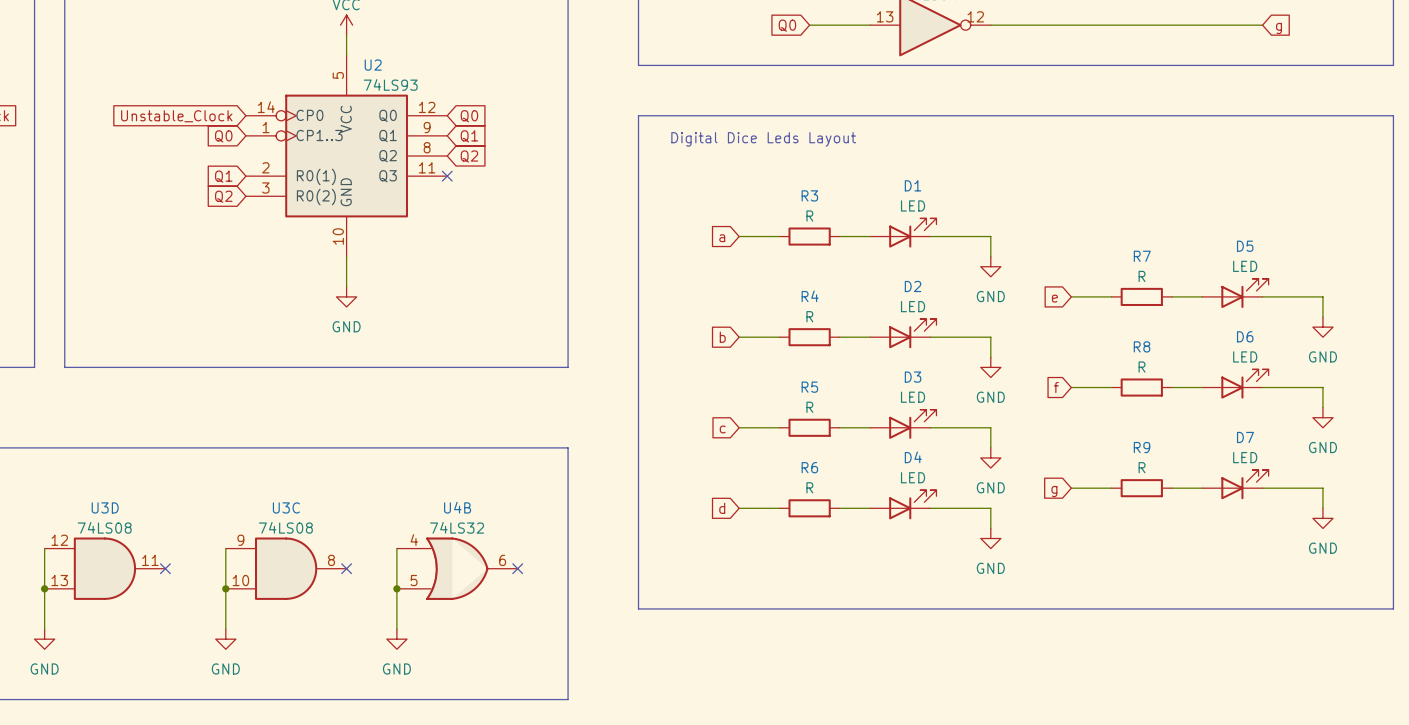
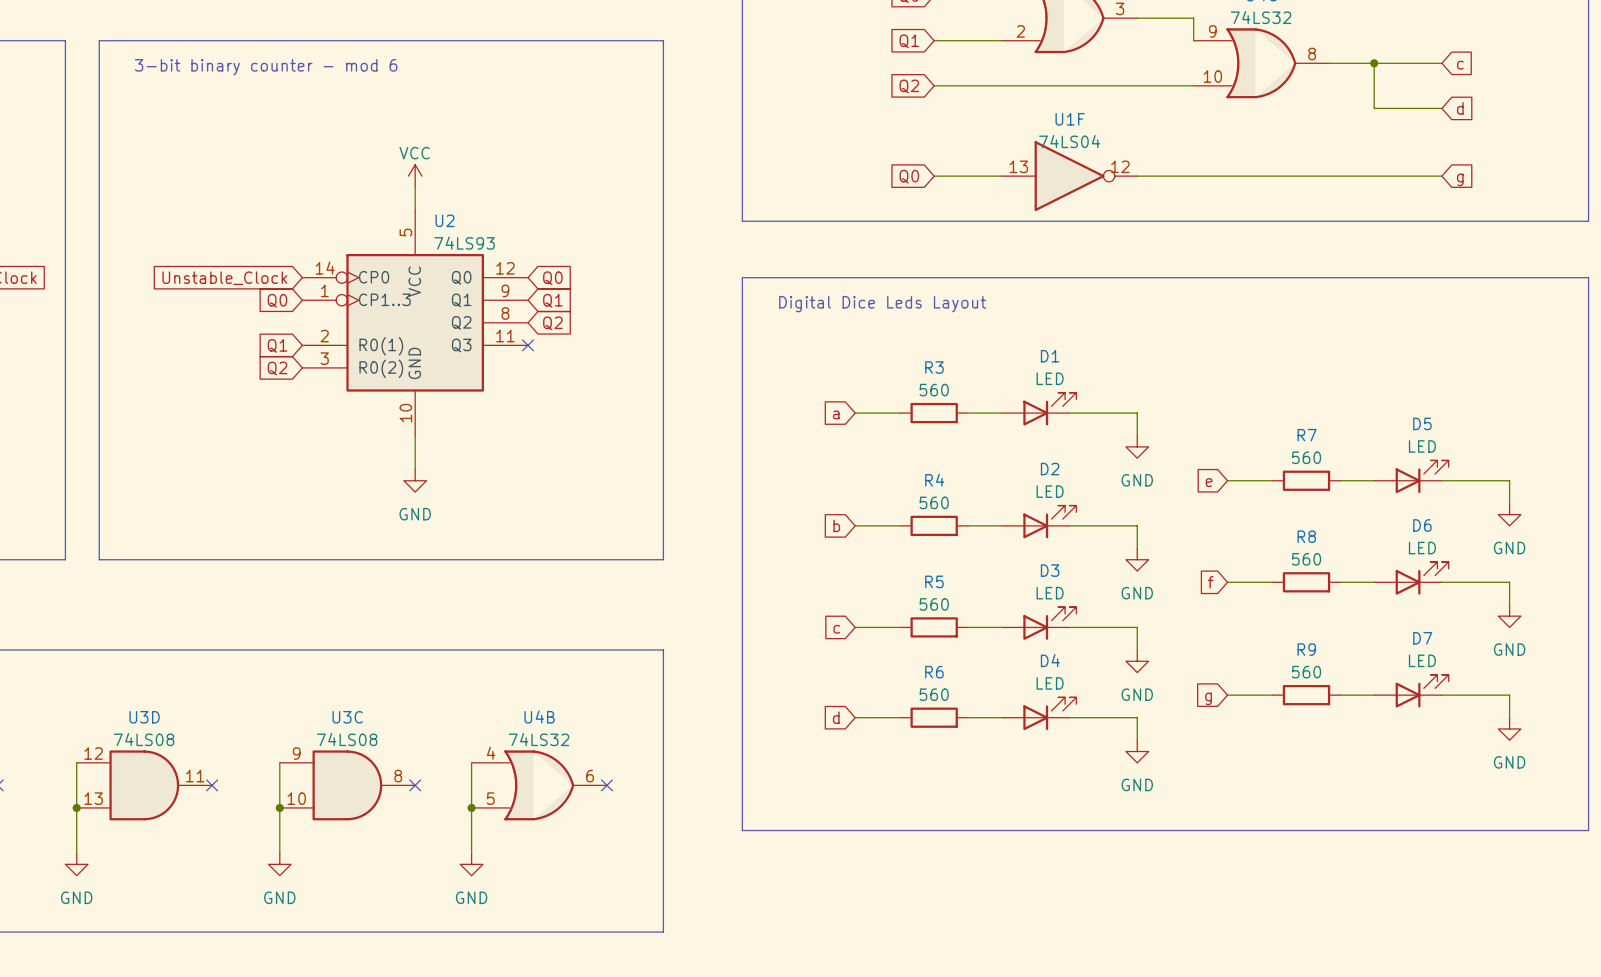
R3 value: R (809, 216) -> 560 (934, 390)
R7 value: R (1142, 276) -> 560 (1306, 457)
R4 value: R (809, 316) -> 560 (934, 502)
R8 value: R (1142, 367) -> 560 (1306, 559)
R5 value: R (809, 407) -> 560 (934, 604)
R9 value: R (1142, 467) -> 560 (1306, 672)
R6 value: R (809, 487) -> 560 (934, 694)

